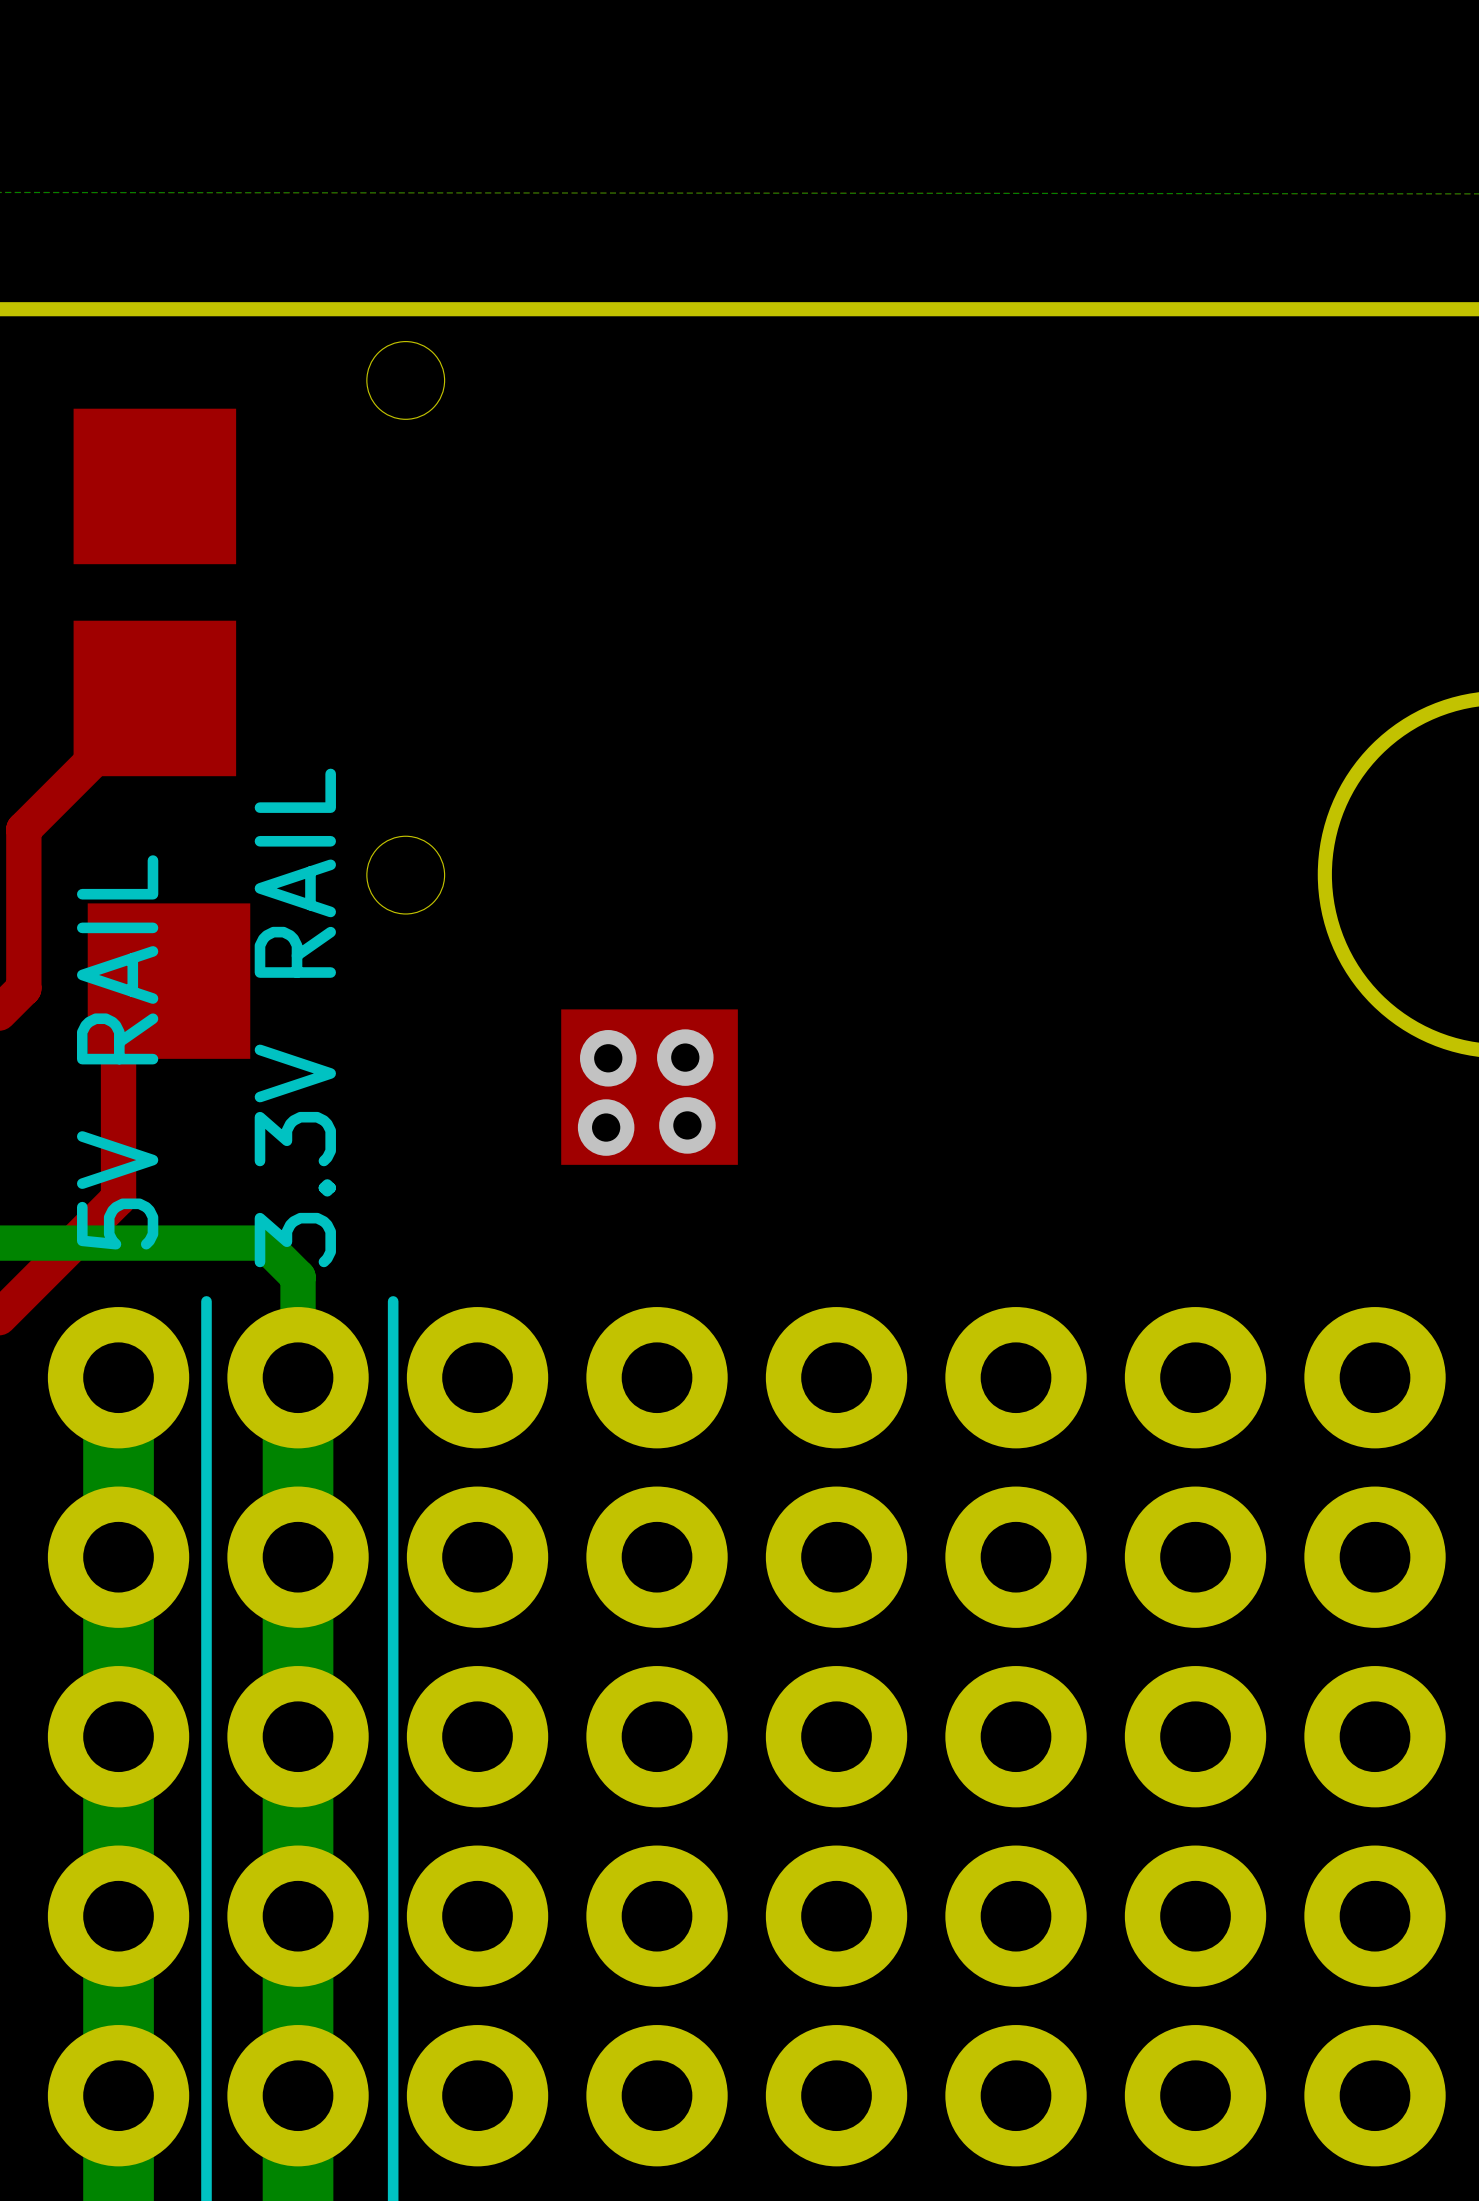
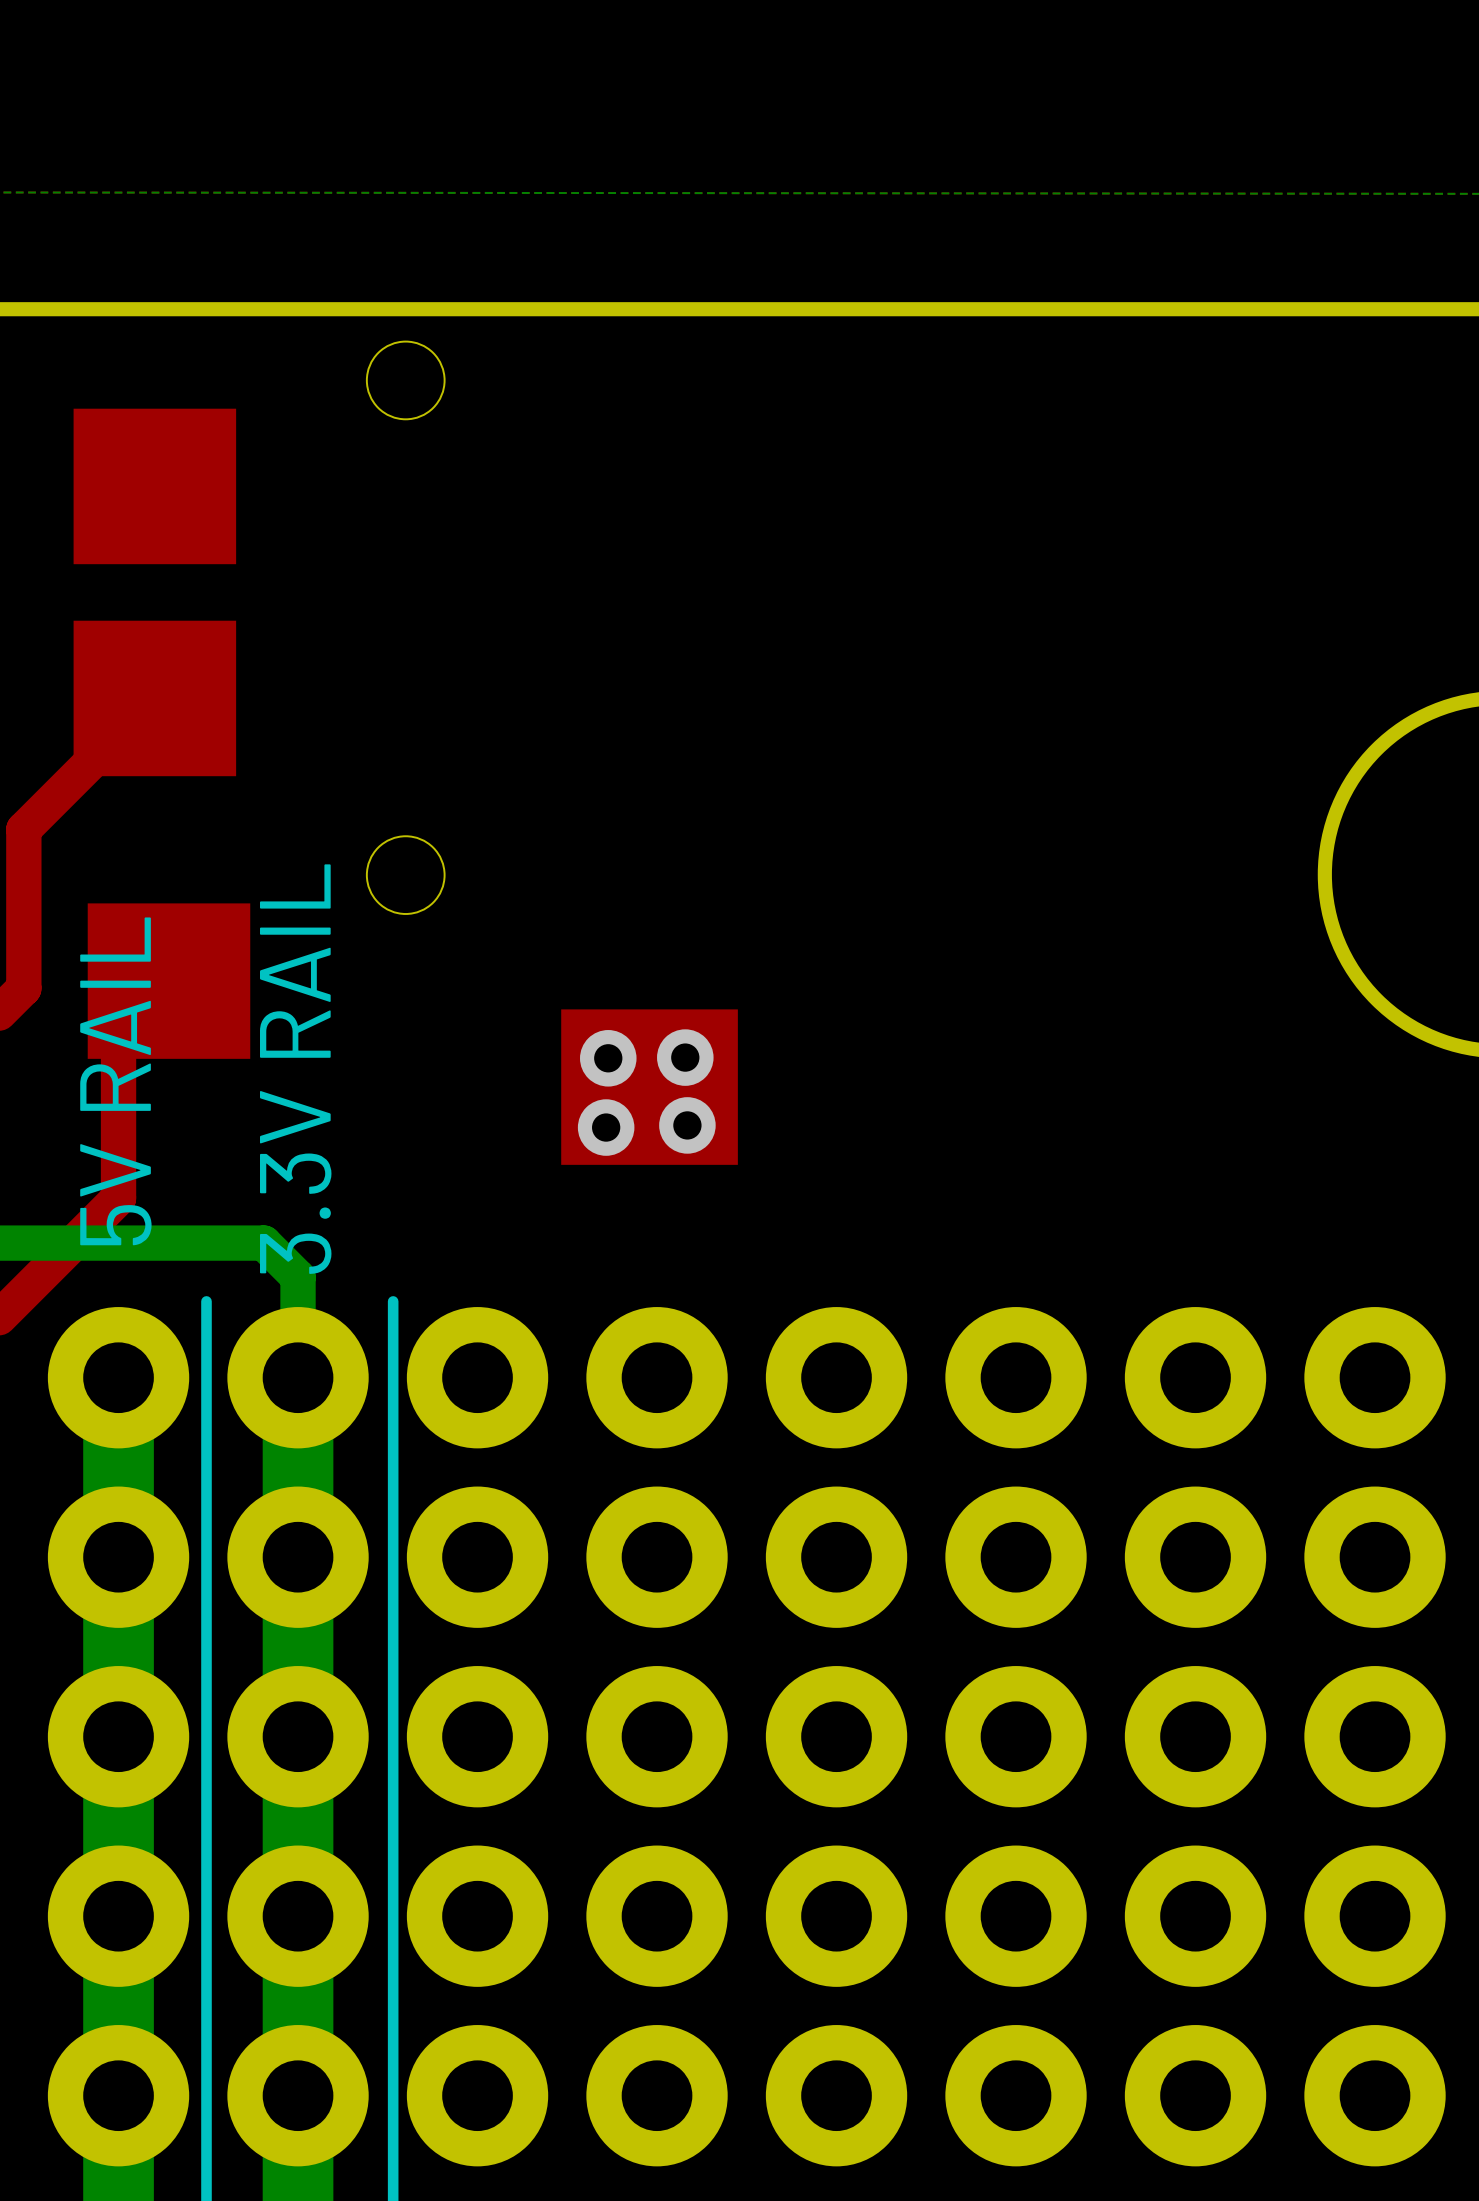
text position: 5V RAIL (117, 1052) -> 5V RAIL (115, 1081)

